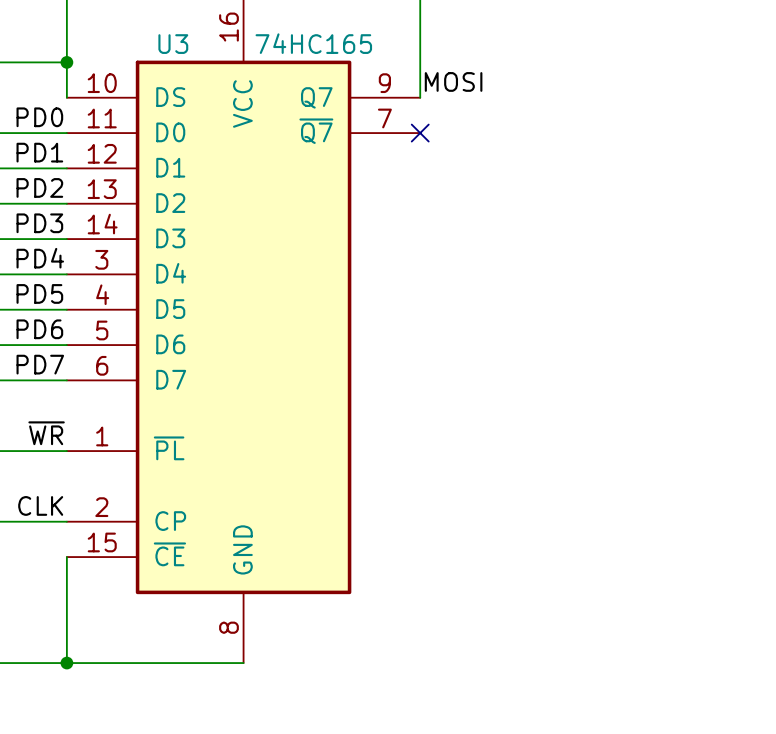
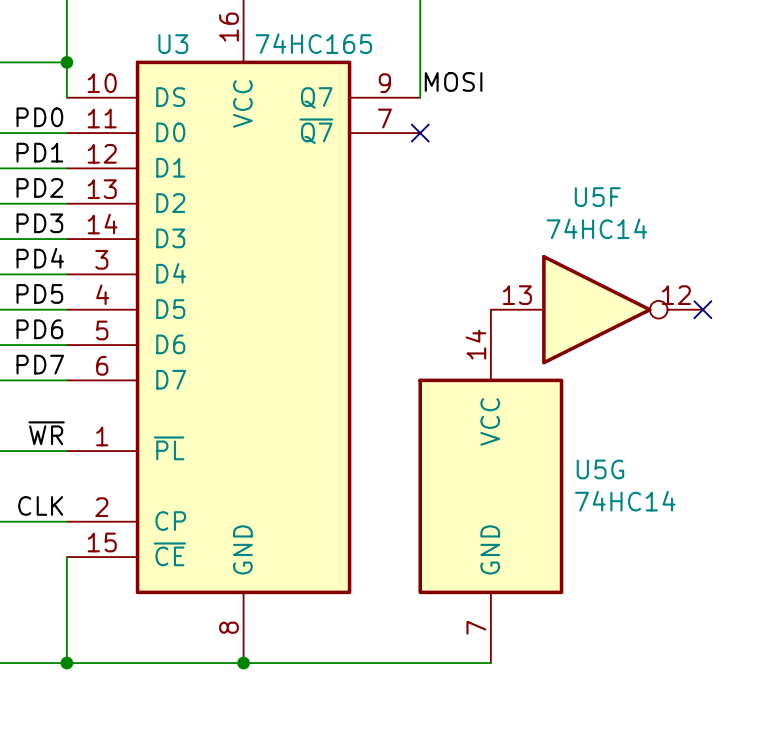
U5F: none -> 74HC14 (596, 309)
no-connect mark: none -> (702, 309)
U5G: none -> 74HC14 (490, 486)
wire: none -> (243, 663) (490, 663)
junction: none -> (243, 663)

